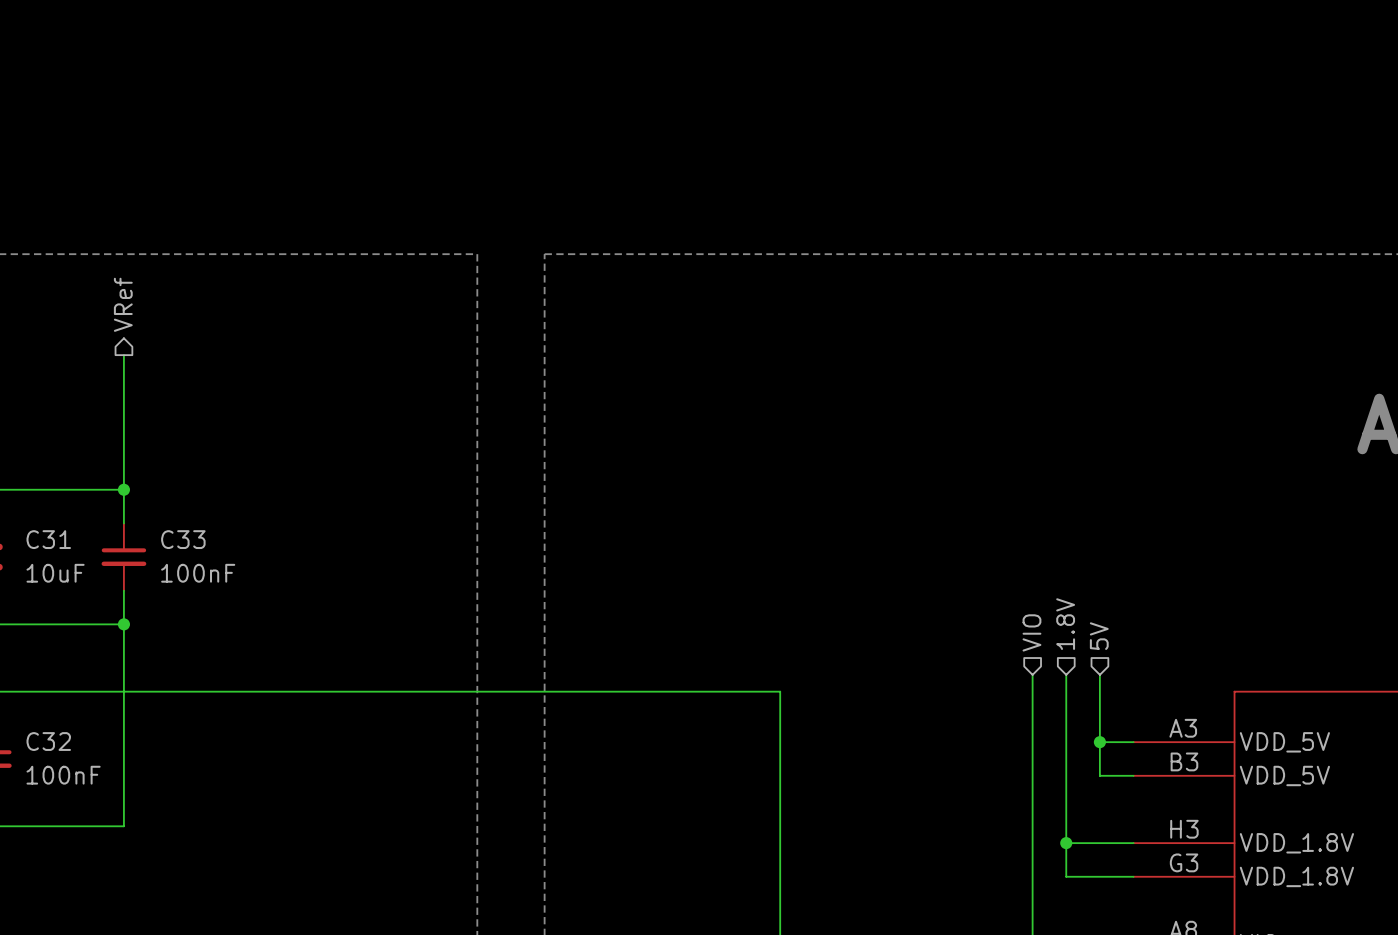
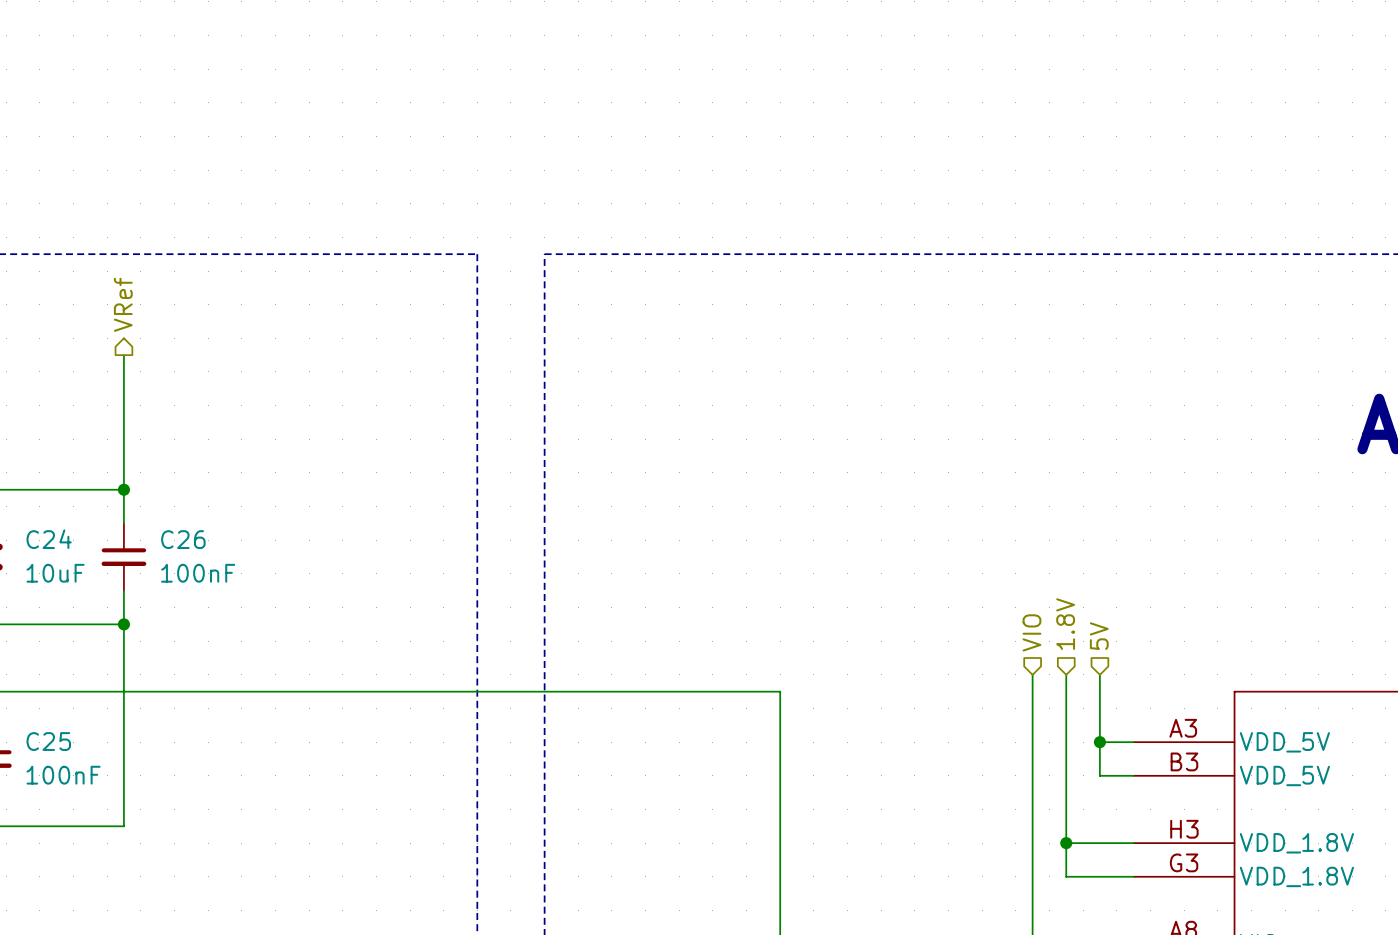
C31 name: C31 (48, 539) -> C24 (49, 539)
C33 name: C33 (183, 539) -> C26 (183, 539)
C32 name: C32 (48, 741) -> C25 (48, 741)

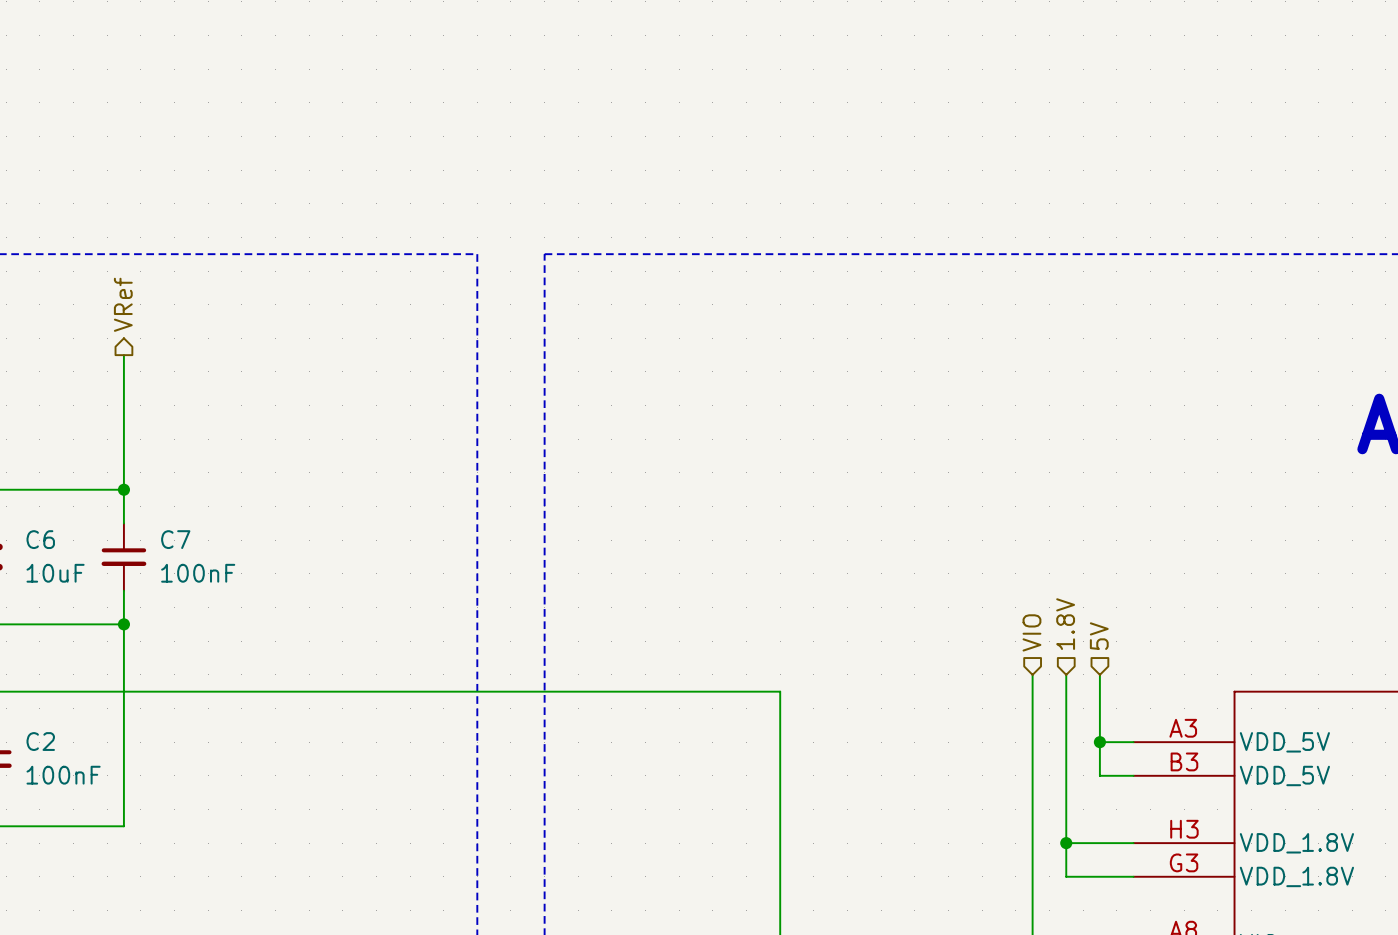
C24 name: C24 (49, 539) -> C6 (40, 539)
C26 name: C26 (183, 539) -> C7 (175, 539)
C25 name: C25 (48, 741) -> C2 (40, 741)

